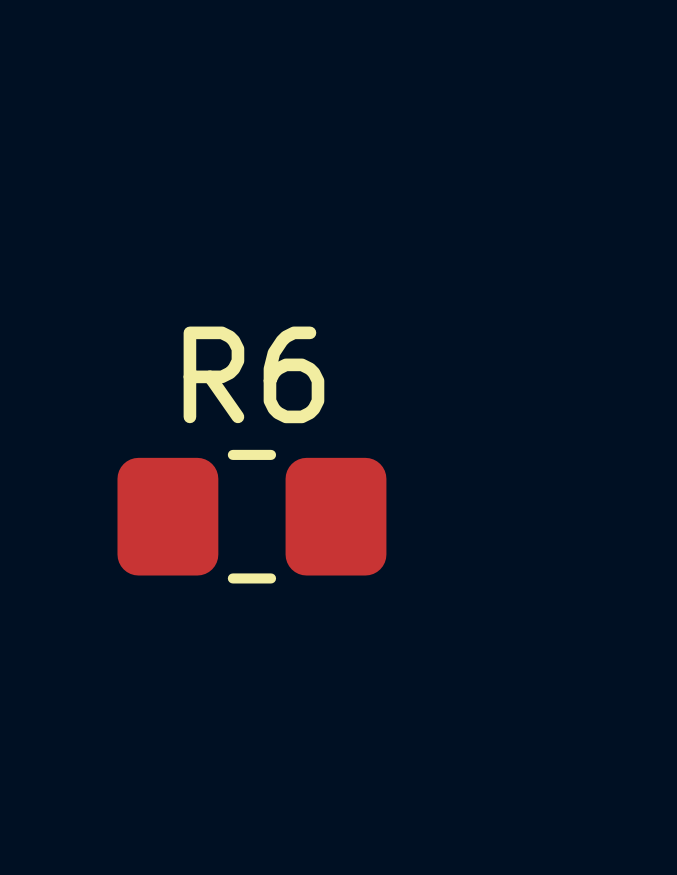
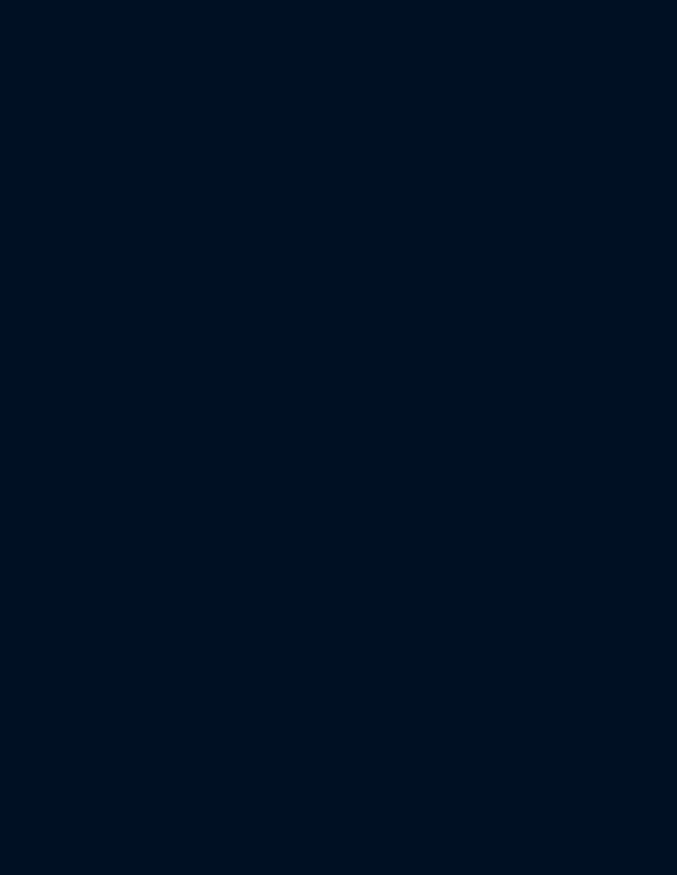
R6: (251, 516) -> none

